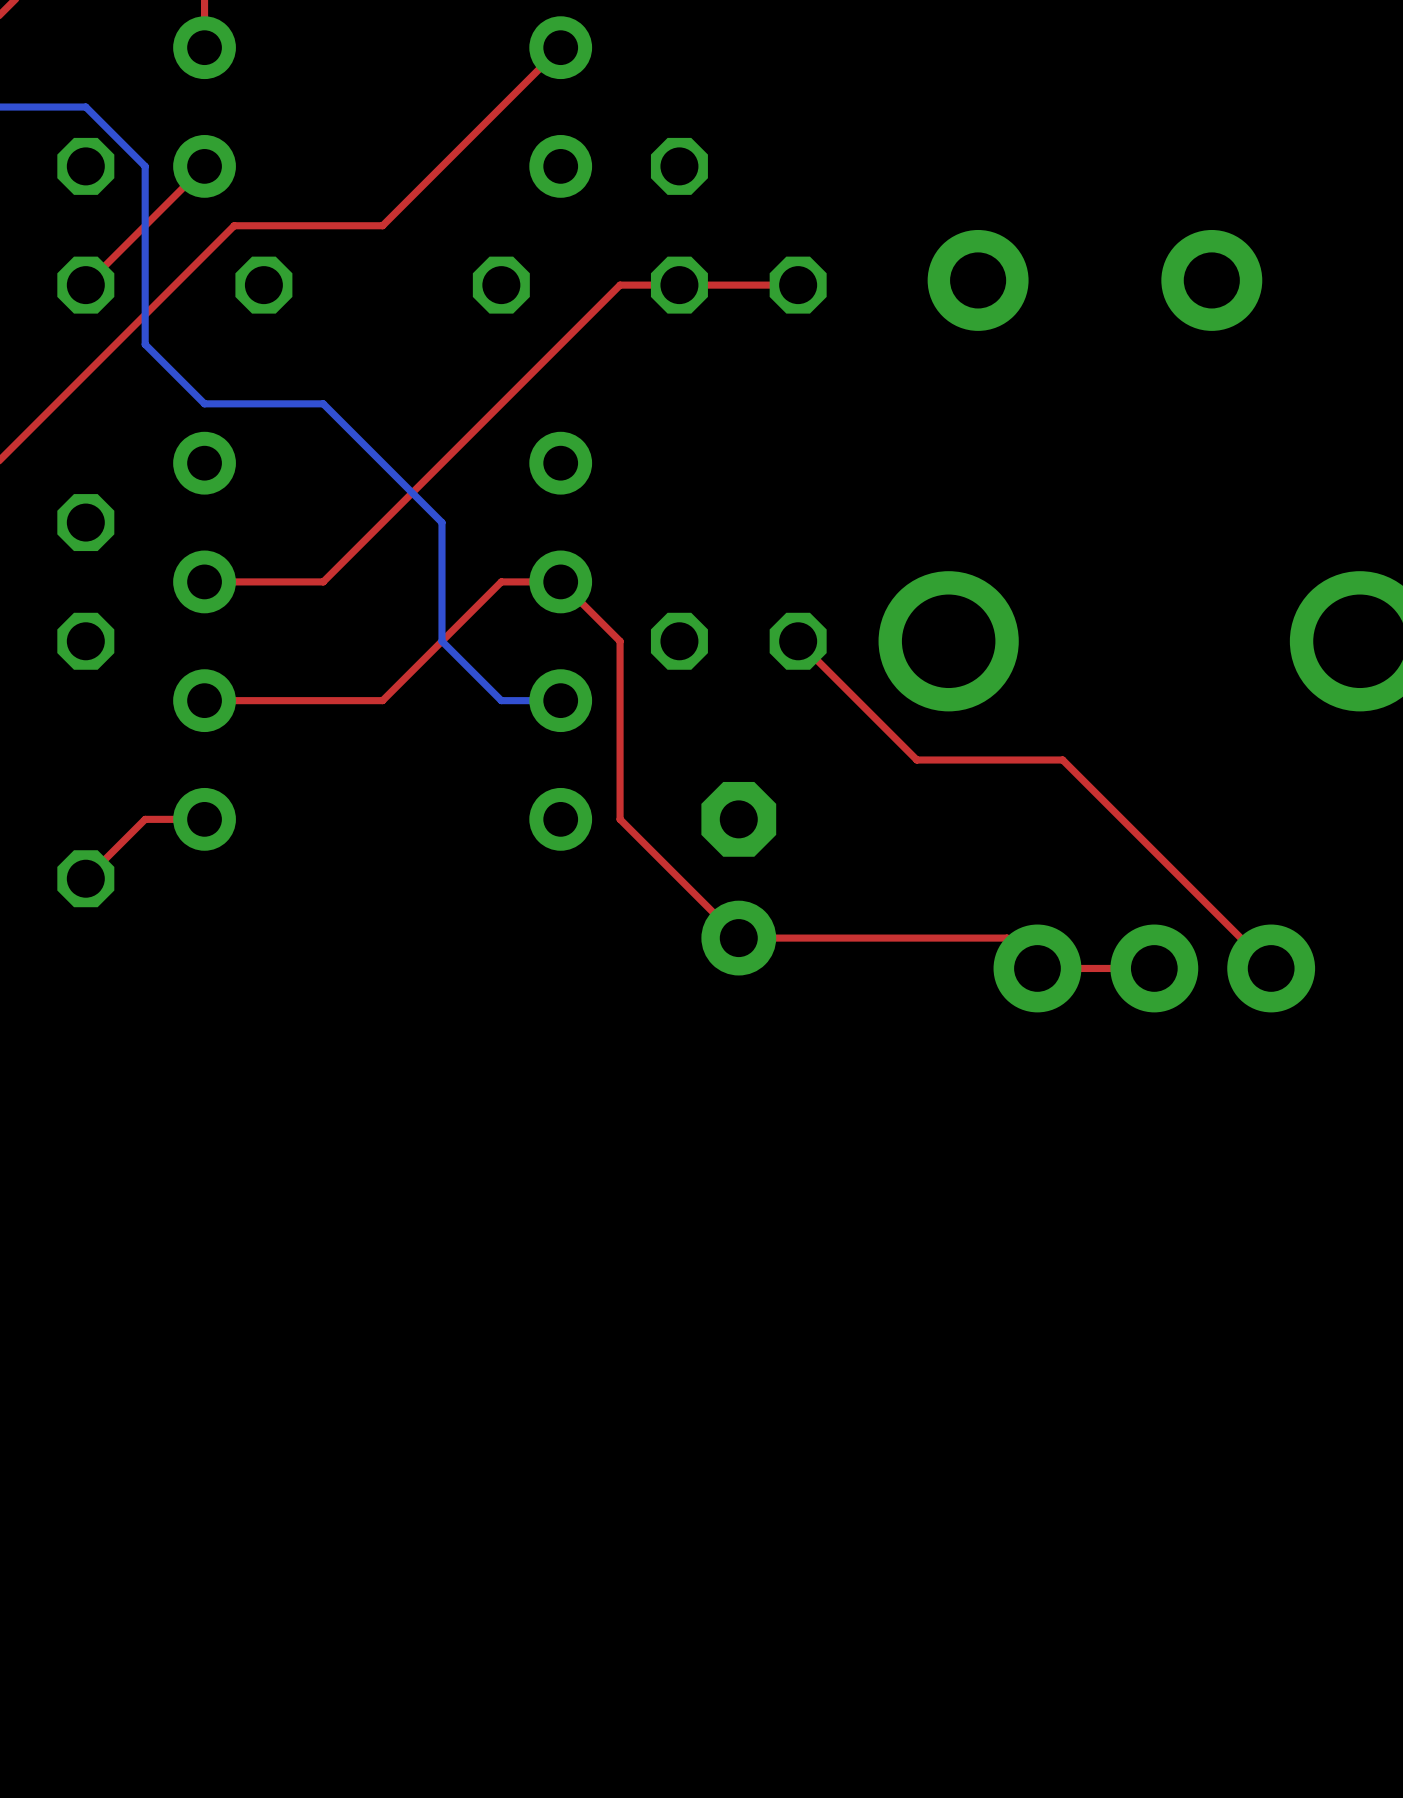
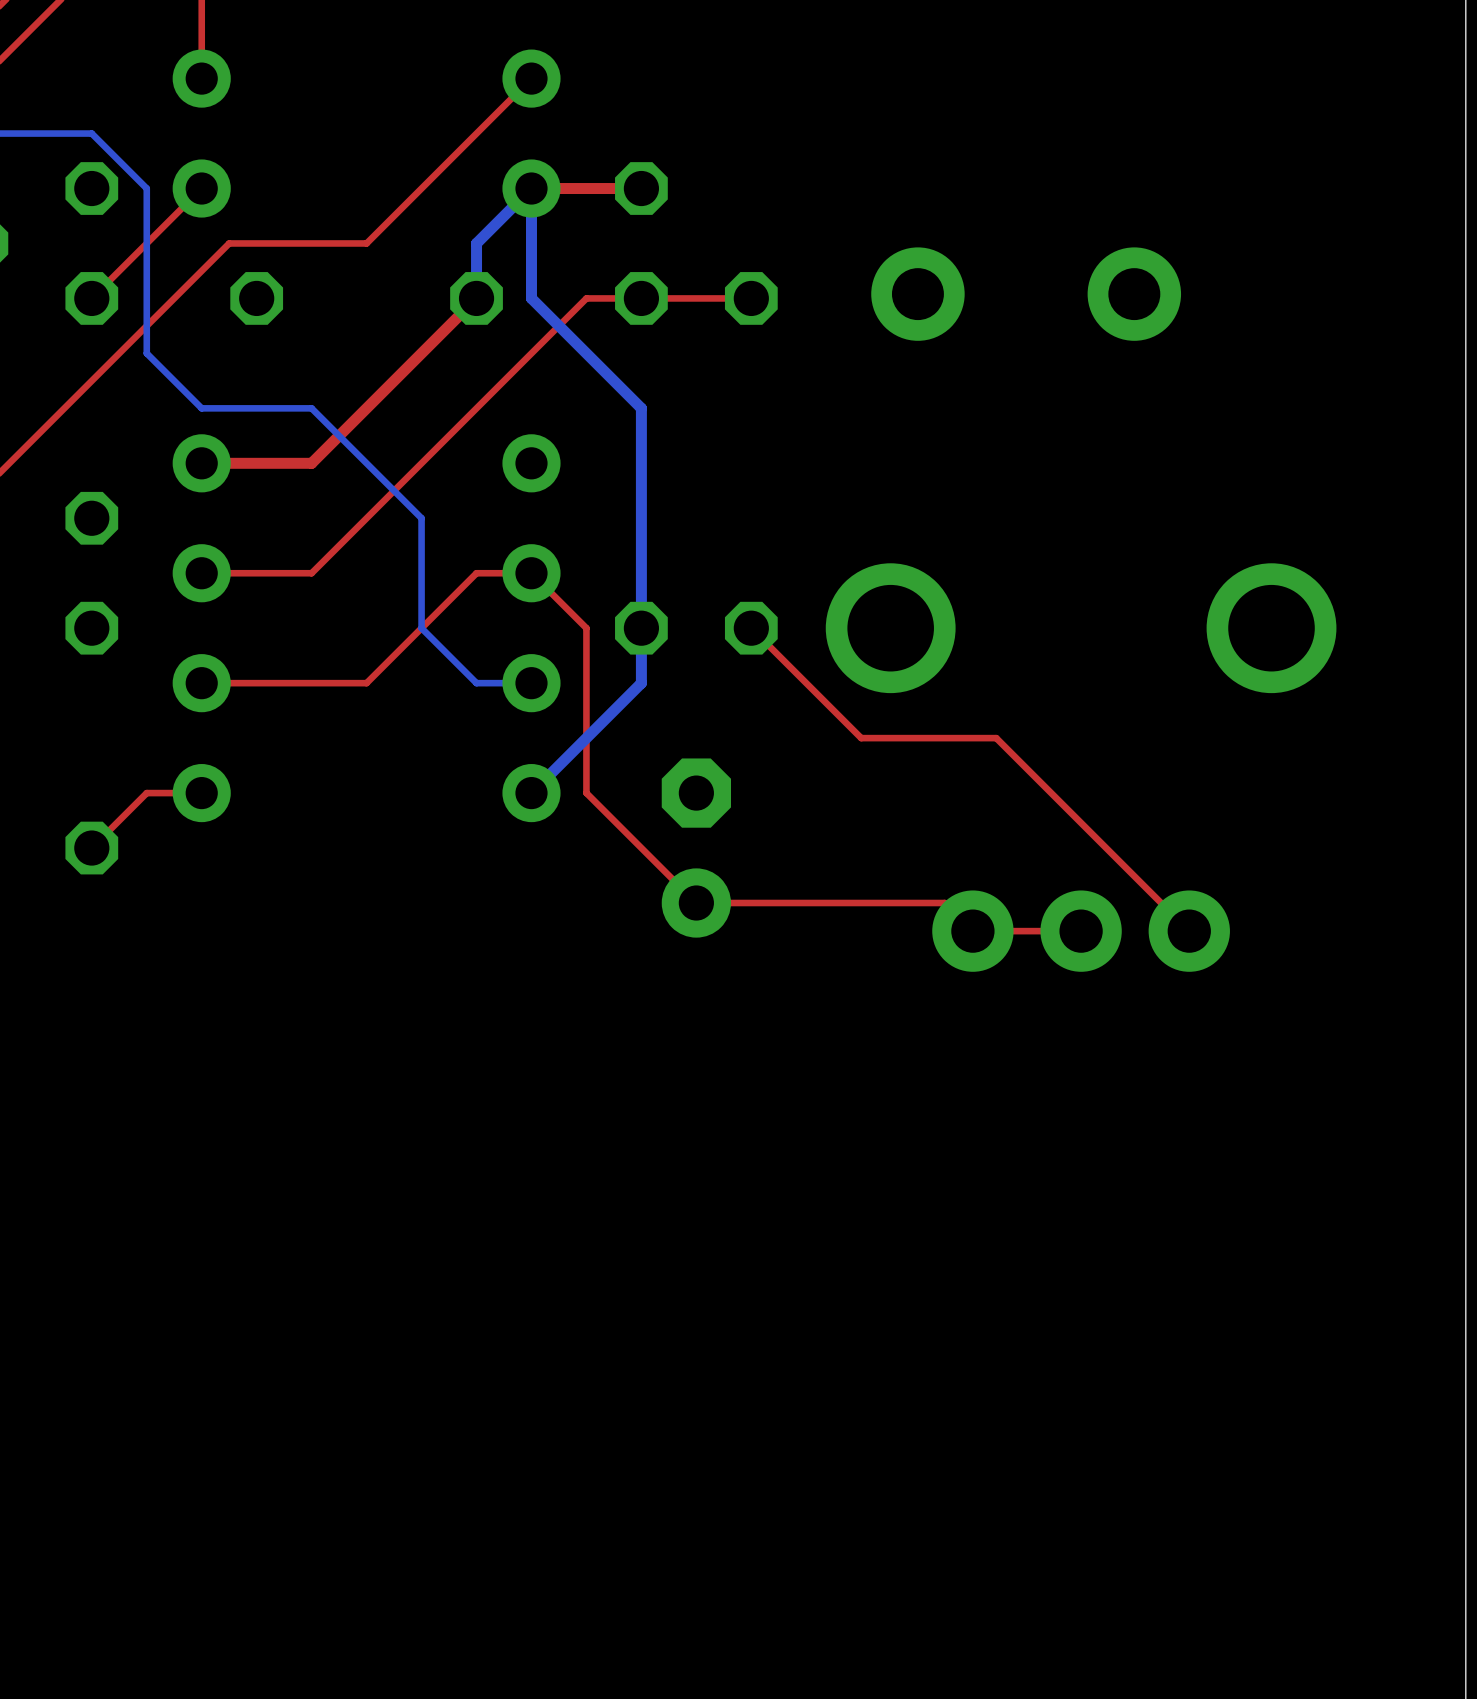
top track: none -> (641, 188) (531, 188)
top track: none -> (476, 298) (311, 463) (201, 463)
bottom track: none -> (476, 298) (476, 243) (531, 188) (531, 298) (641, 408) (641, 683) (531, 793)

